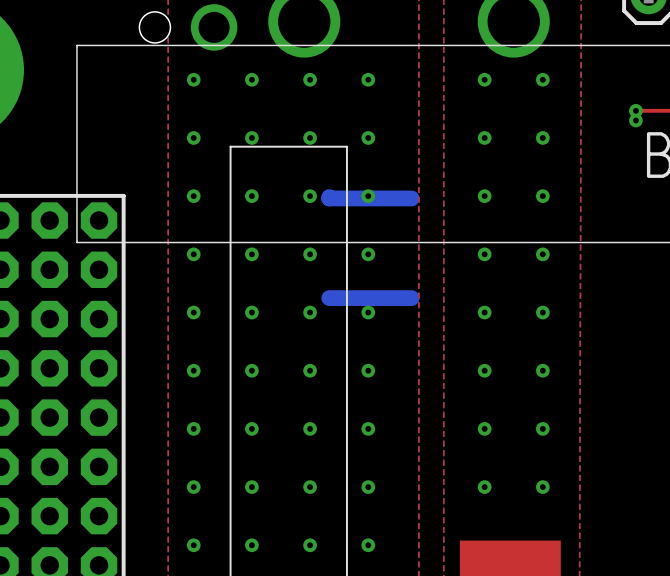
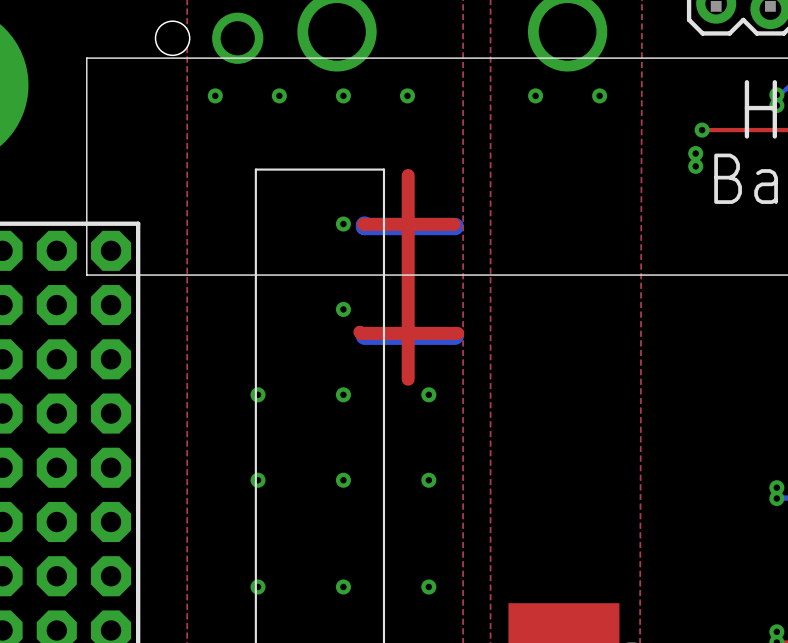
via position: (635, 120) -> (695, 153)
via: (193, 137) -> none
via: (251, 137) -> none
via: (310, 137) -> none
via: (368, 137) -> none
via: (484, 137) -> none
via: (542, 137) -> none
via: none -> (695, 166)
top track: none -> (408, 175) (408, 379)
via: (193, 196) -> none
via: (251, 196) -> none
top track: none -> (363, 224) (454, 224)
via: (368, 196) -> none
via: (484, 196) -> none
via: (542, 196) -> none
via: (193, 254) -> none
via: (251, 254) -> none
via: (310, 254) -> none
via: (368, 254) -> none
via: (484, 254) -> none
via: (542, 254) -> none
via: none -> (343, 309)
top track: none -> (359, 332) (457, 333)
via: (193, 312) -> none
via: (251, 312) -> none
via: (310, 312) -> none
via: (368, 312) -> none
via: (484, 312) -> none
via: (542, 312) -> none
via: none -> (258, 394)
via: none -> (343, 394)
via: none -> (428, 394)
via: (193, 370) -> none
via: (251, 370) -> none
via: (310, 370) -> none
via: (368, 370) -> none
via: (484, 370) -> none
via: (542, 370) -> none
via: (193, 428) -> none
via: none -> (258, 480)
via: (251, 428) -> none
via position: (368, 428) -> (428, 480)
via: (484, 428) -> none
via: (542, 428) -> none
via: (193, 487) -> none
via: (251, 487) -> none
via: (310, 487) -> none
via: (368, 487) -> none
via: (484, 487) -> none
via: (542, 487) -> none
via: none -> (258, 586)
via: none -> (343, 586)
via: none -> (428, 586)
via: (193, 545) -> none
via: (251, 545) -> none
via: (310, 545) -> none
via: (368, 545) -> none

